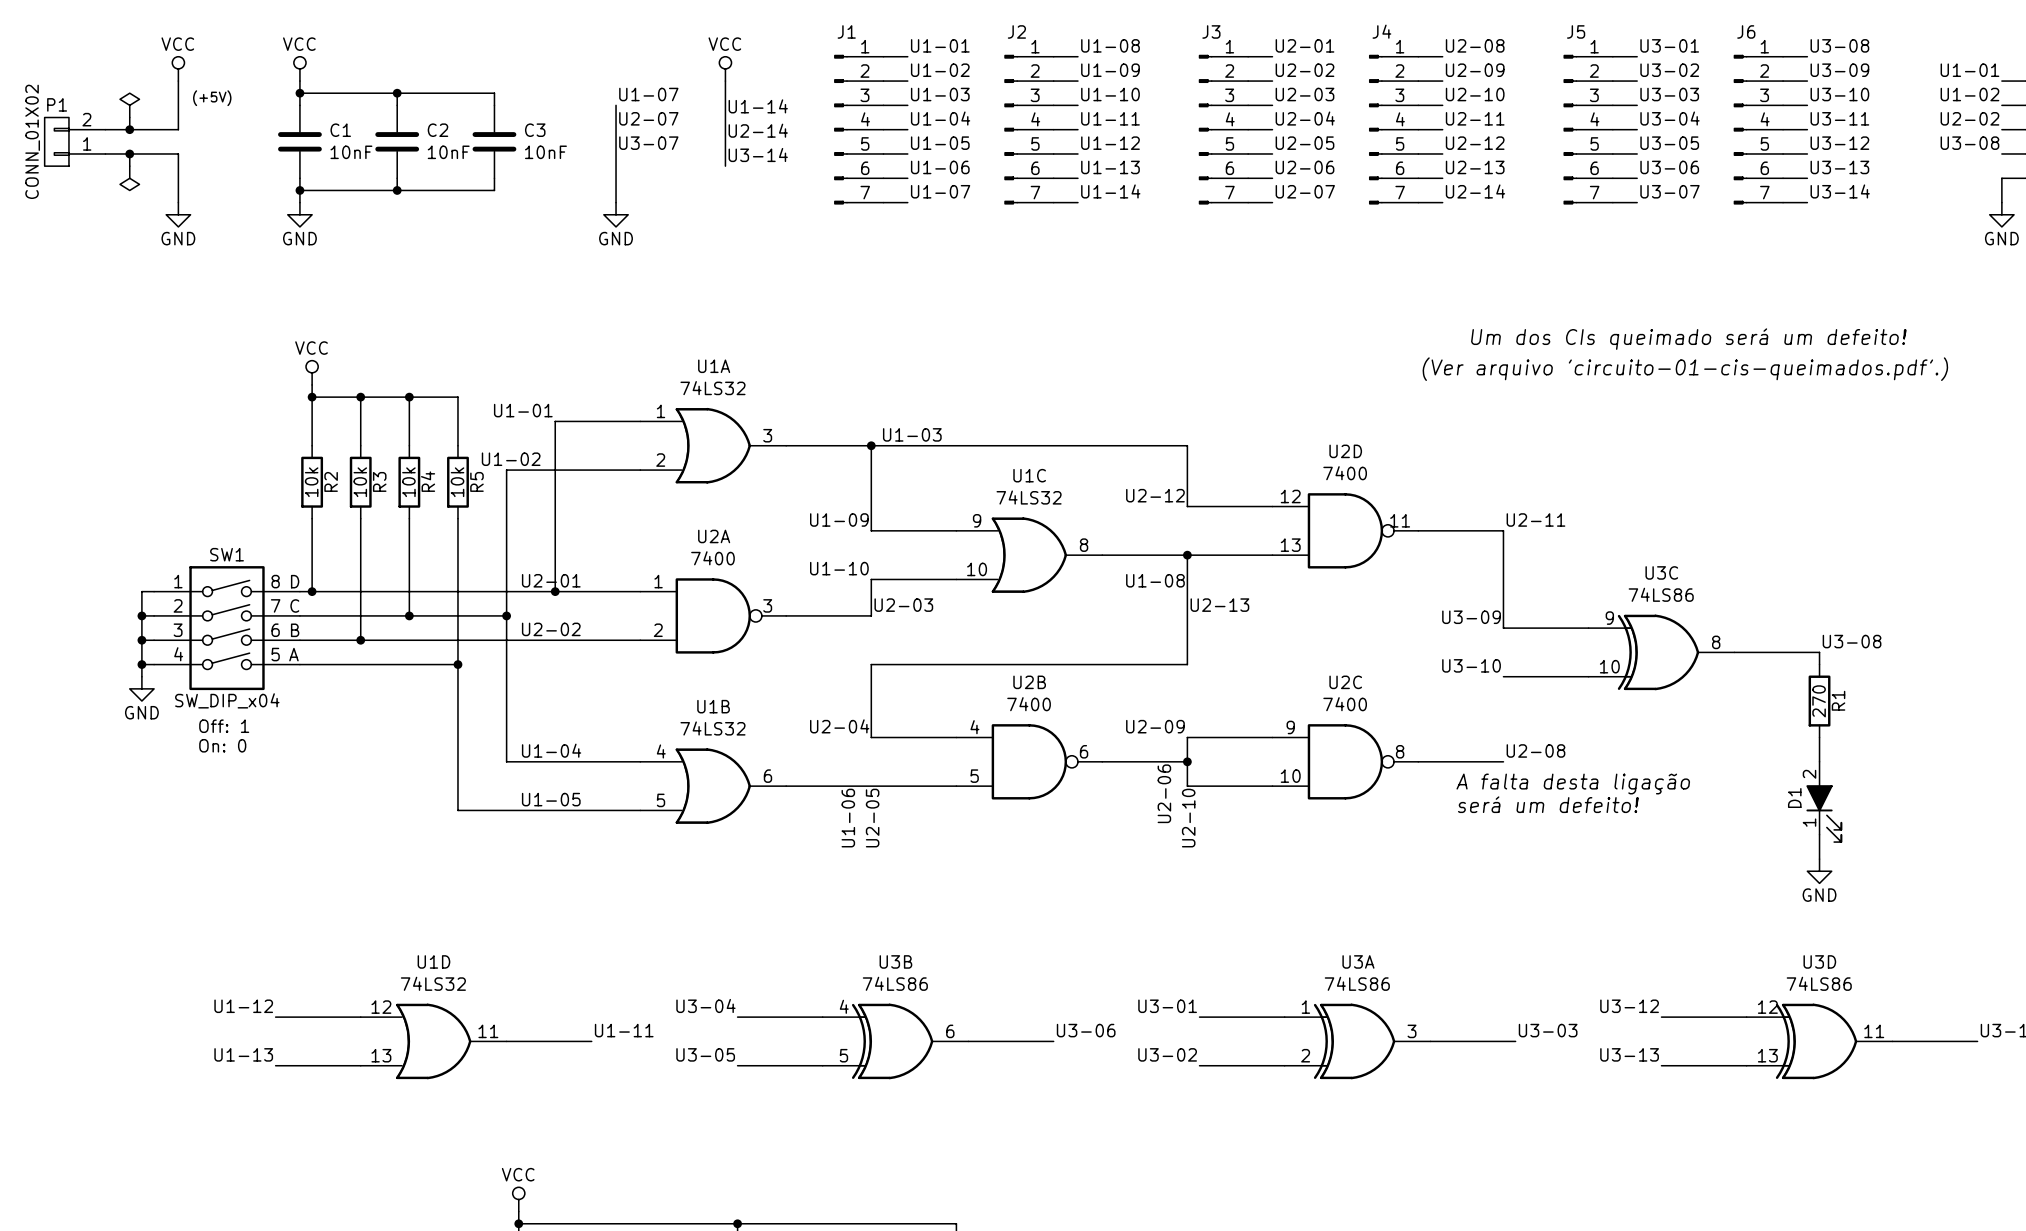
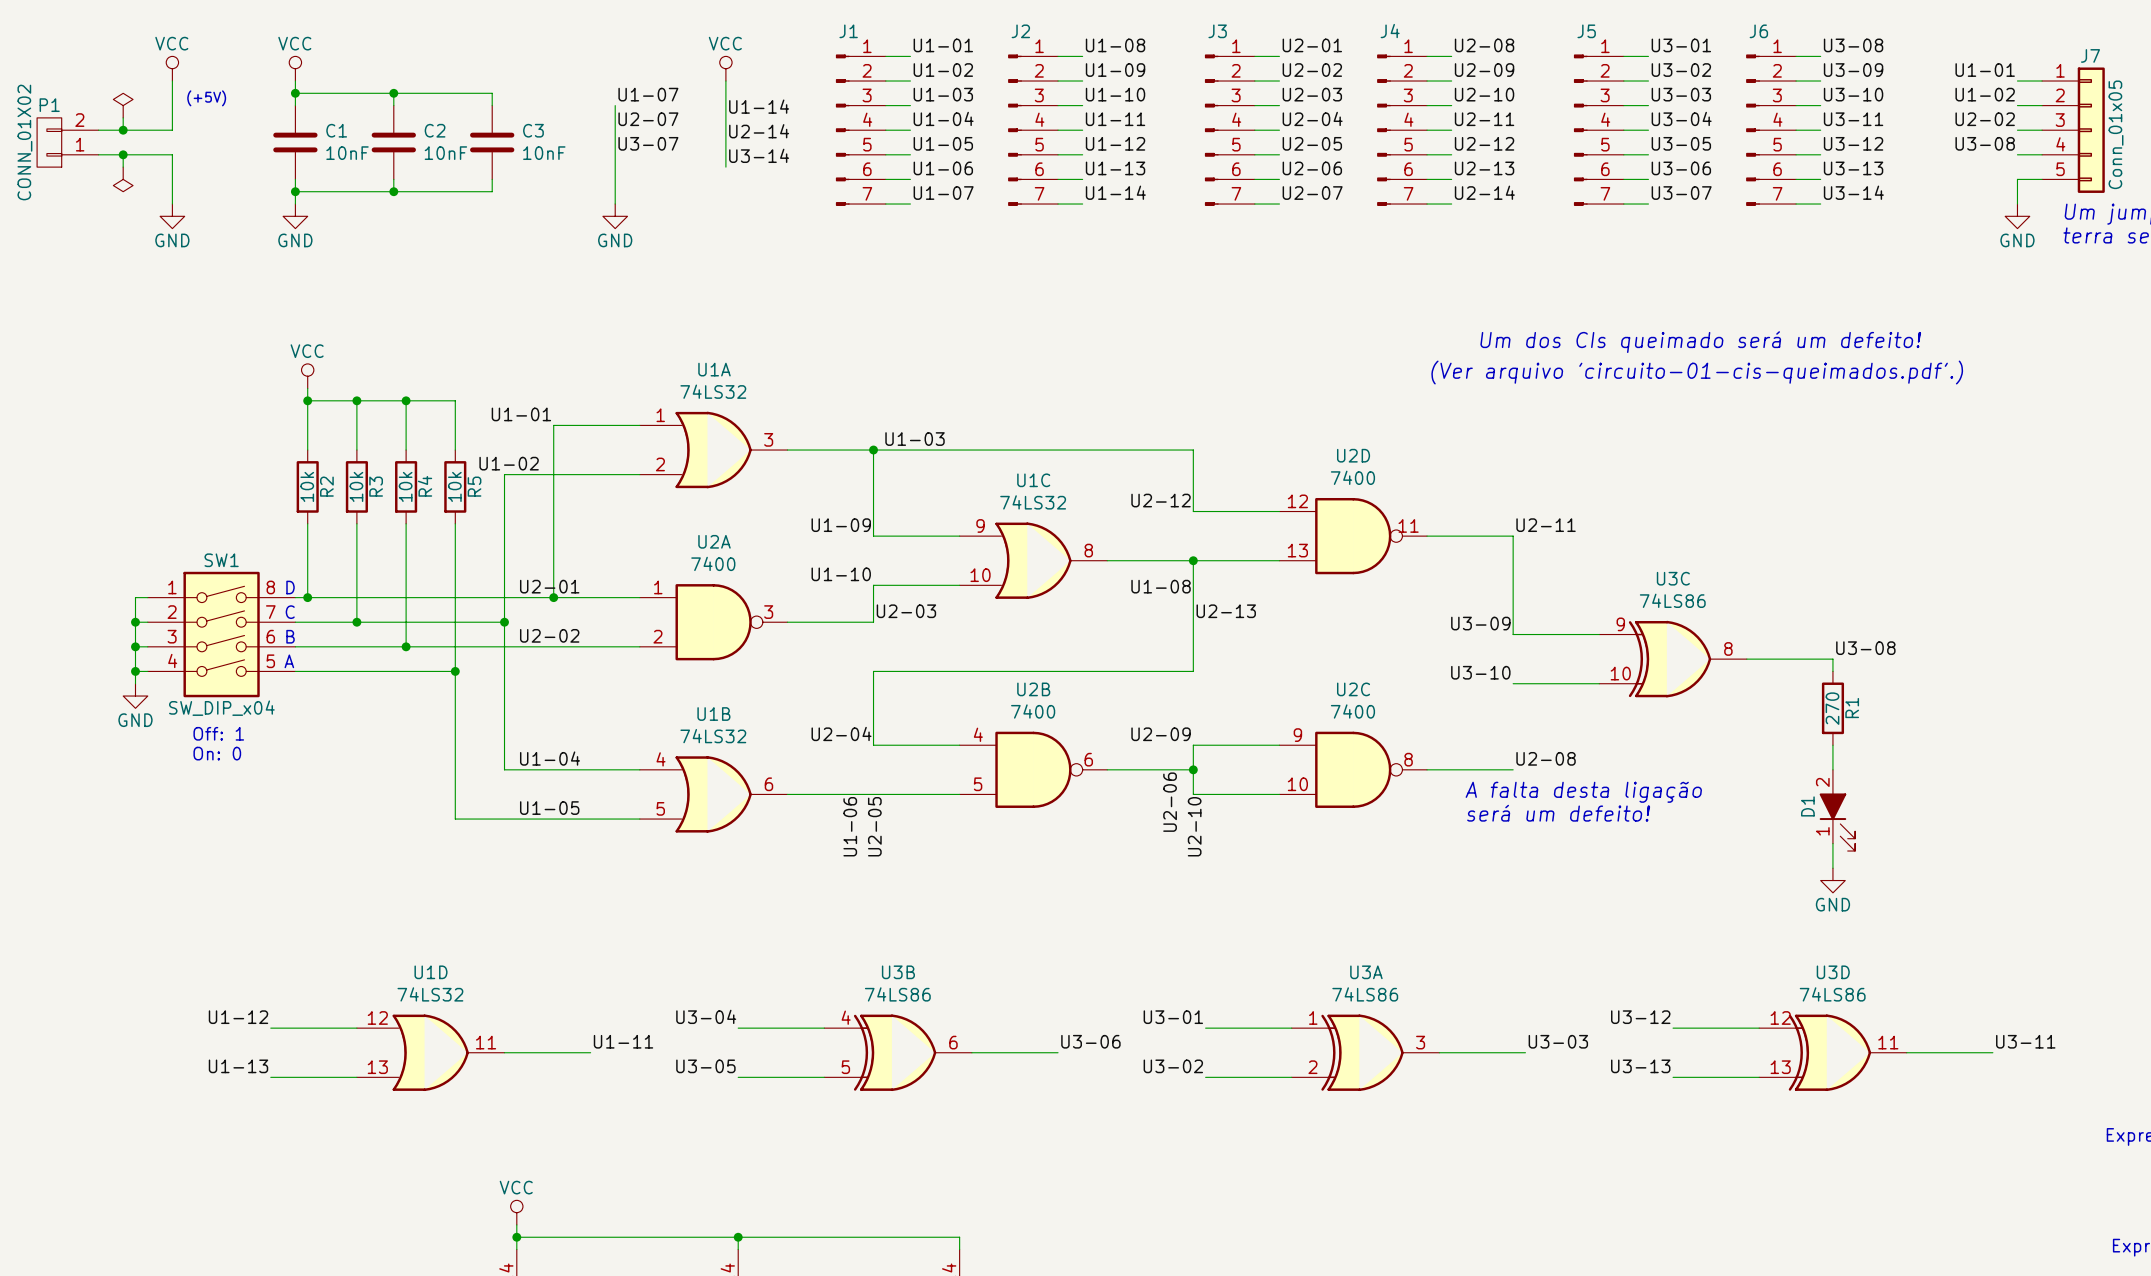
wire: (360, 615) (360, 640) -> (406, 622) (406, 646)
junction: none -> (356, 622)
junction: (409, 615) -> none
junction: (360, 640) -> none
junction: none -> (406, 646)

